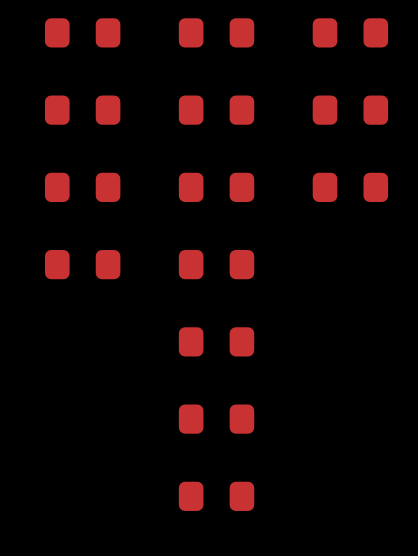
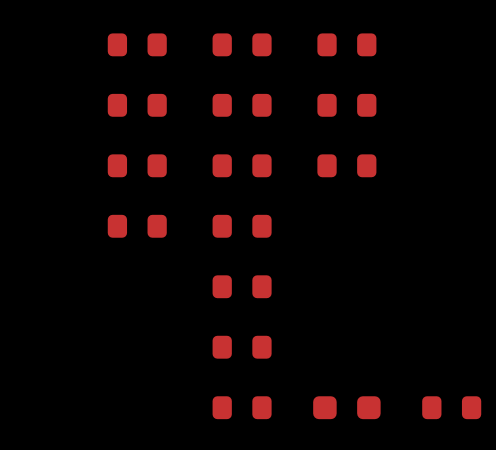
part: none -> (346, 407)

